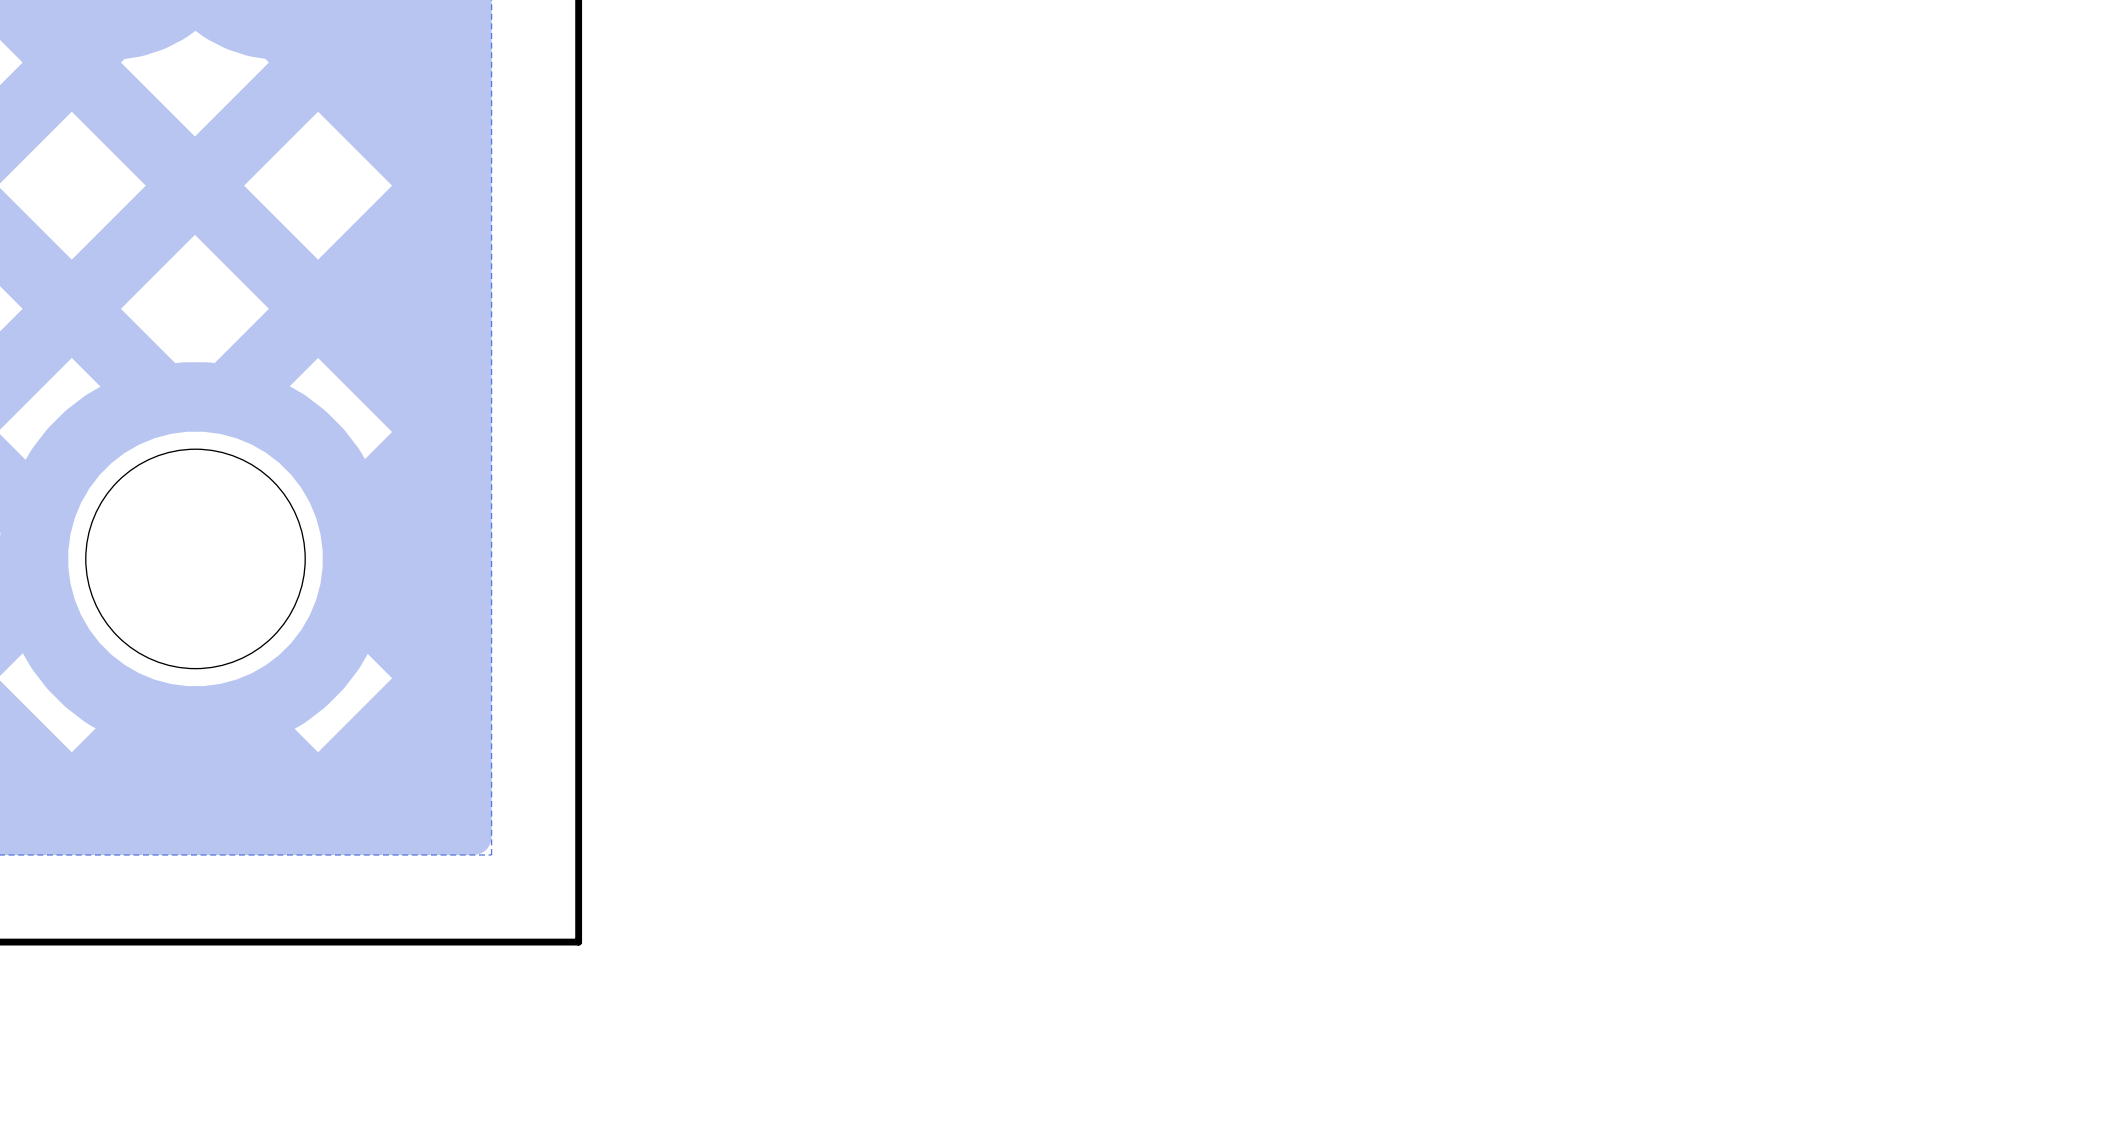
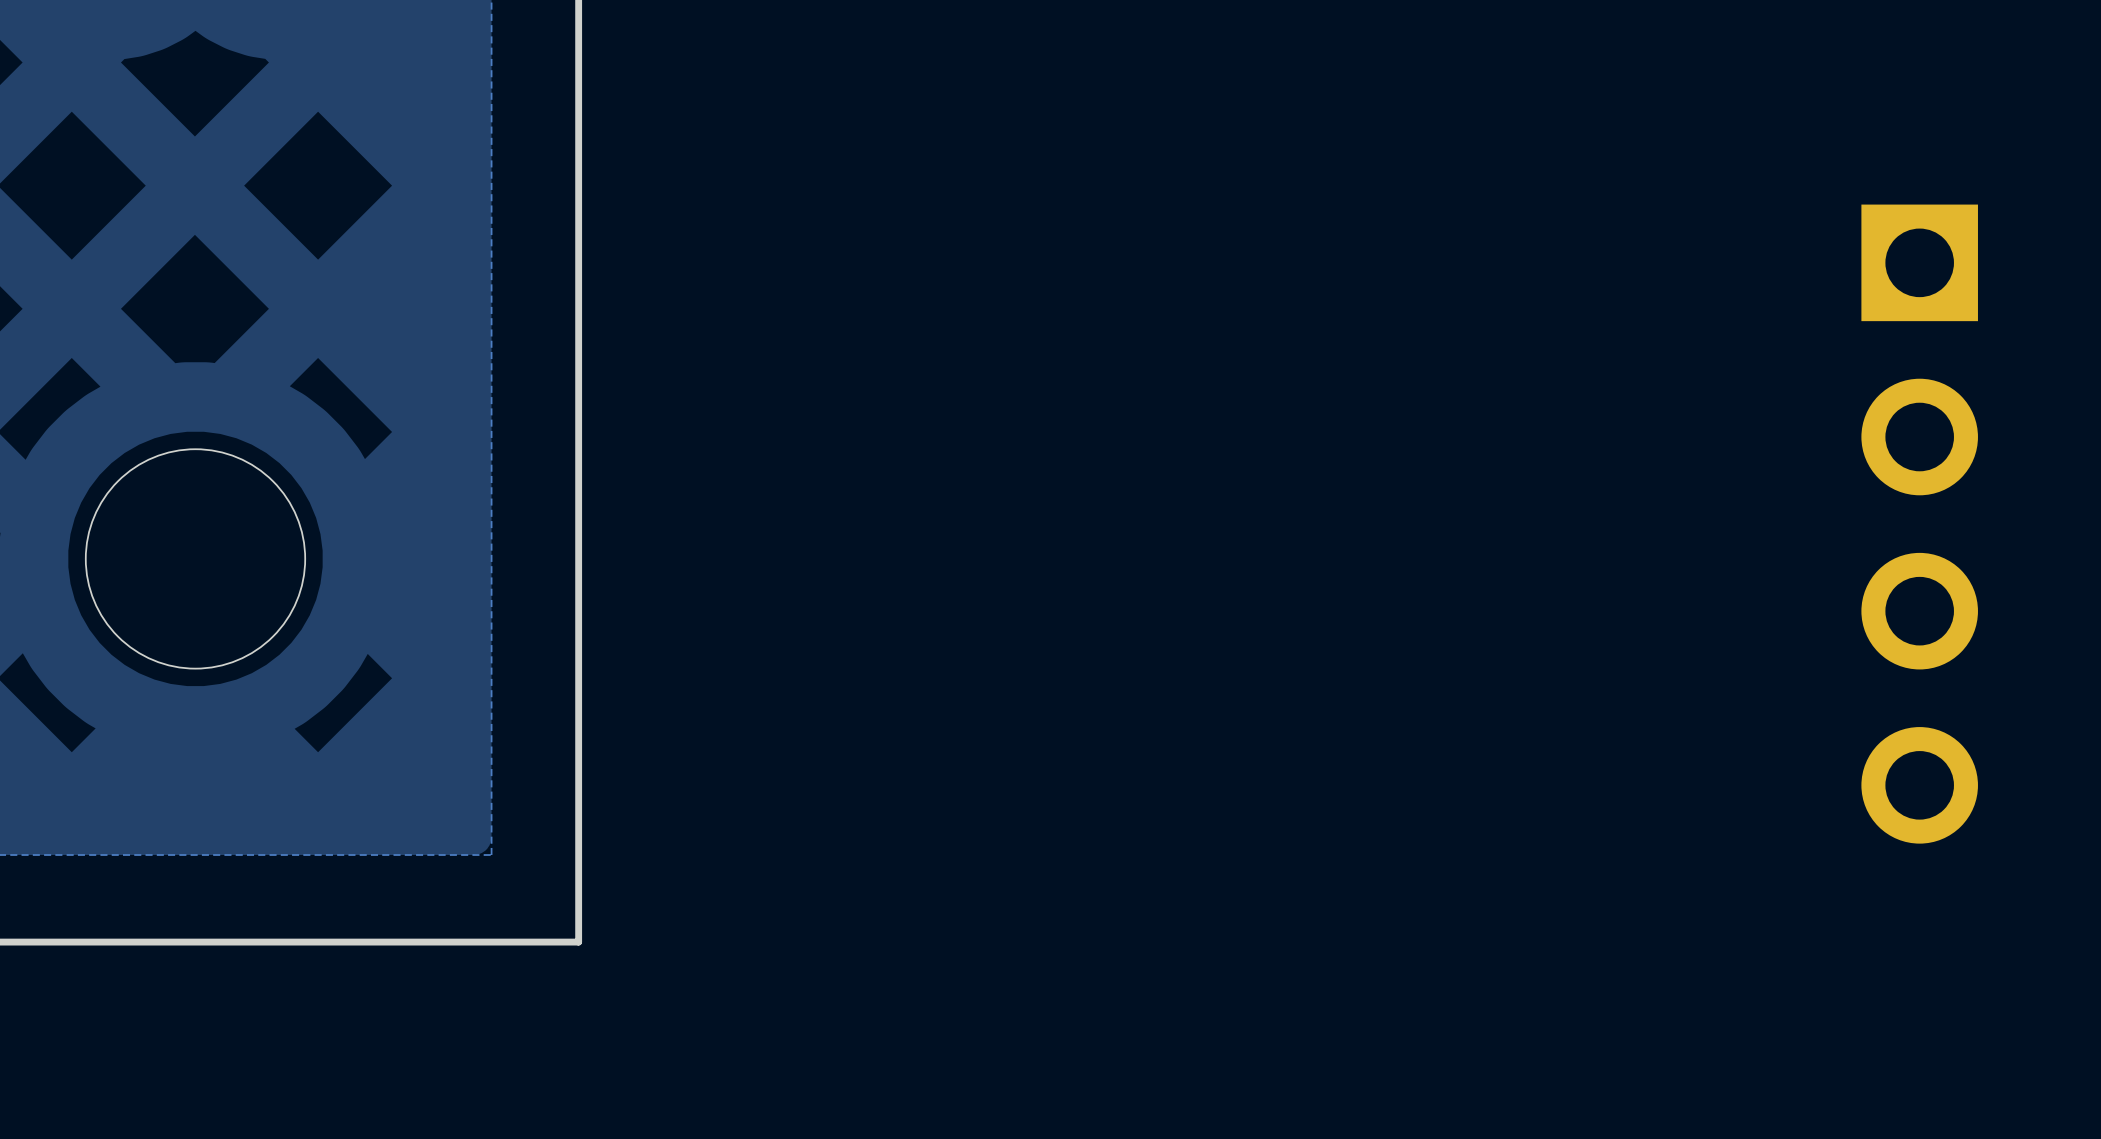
part: none -> (1919, 524)

